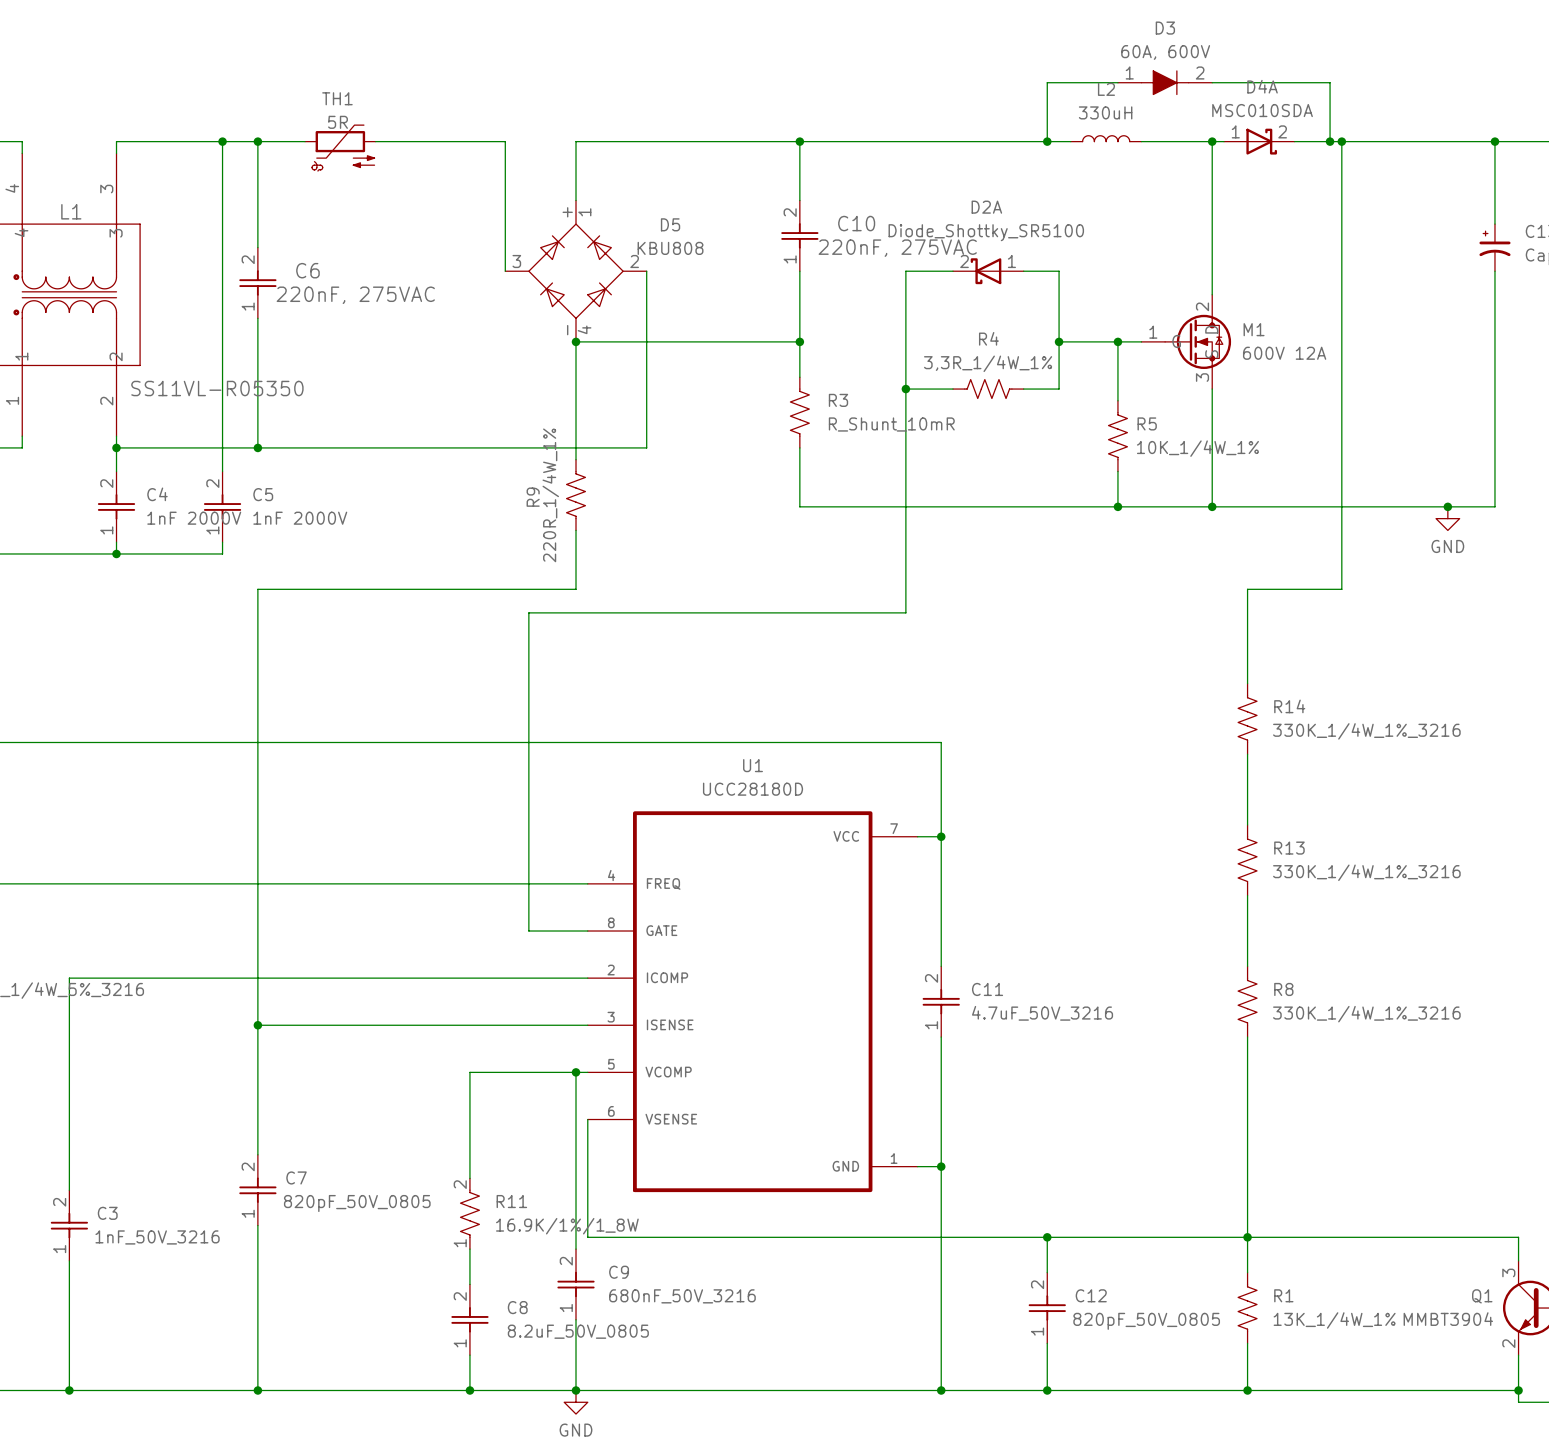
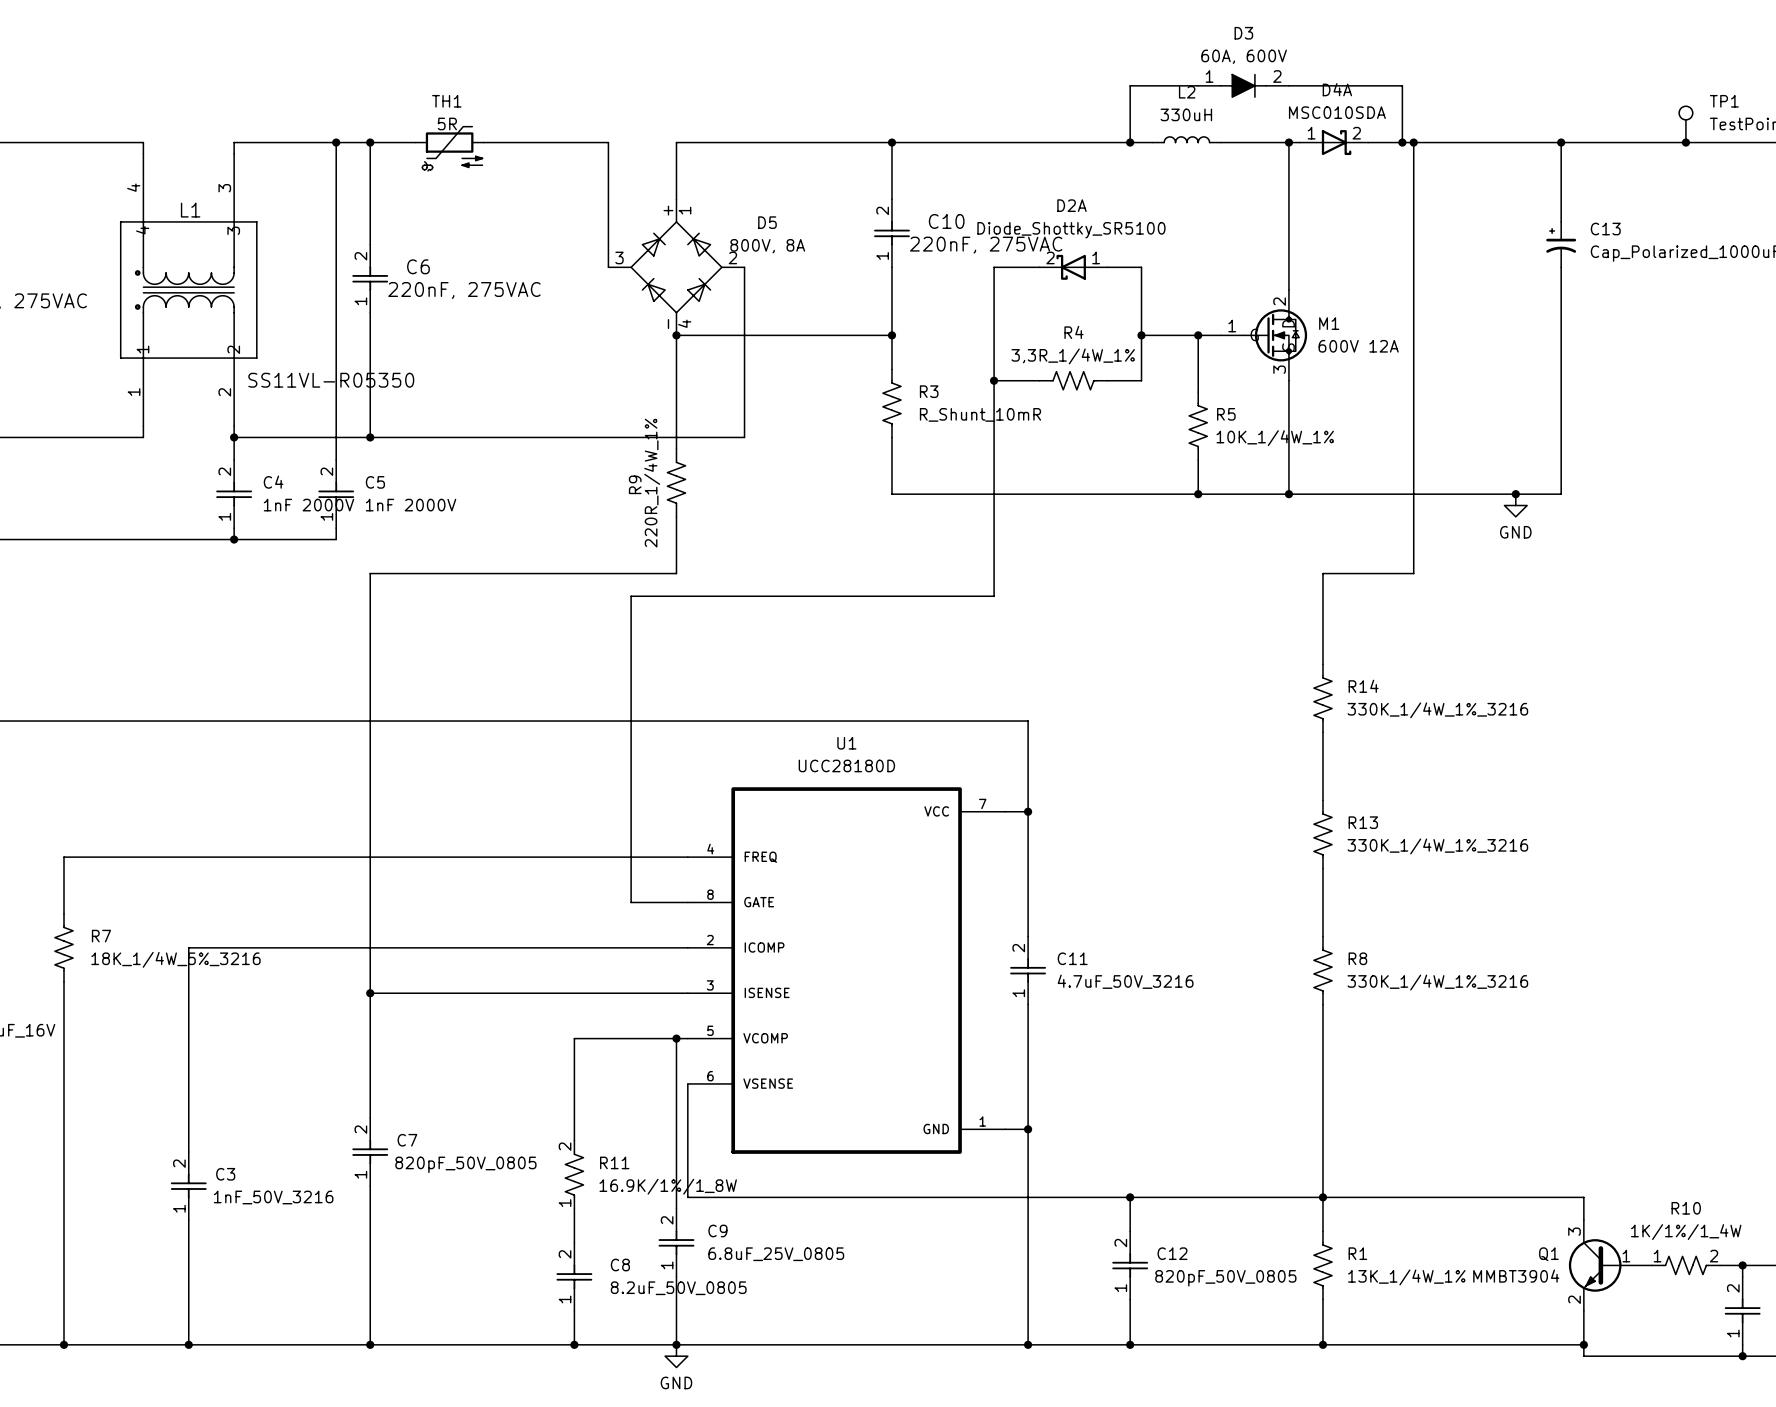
D5 value: KBU808 (670, 248) -> 800V, 8A (767, 246)
C9 value: 680nF_50V_3216 (682, 1296) -> 6.8uF_25V_0805 (776, 1254)

